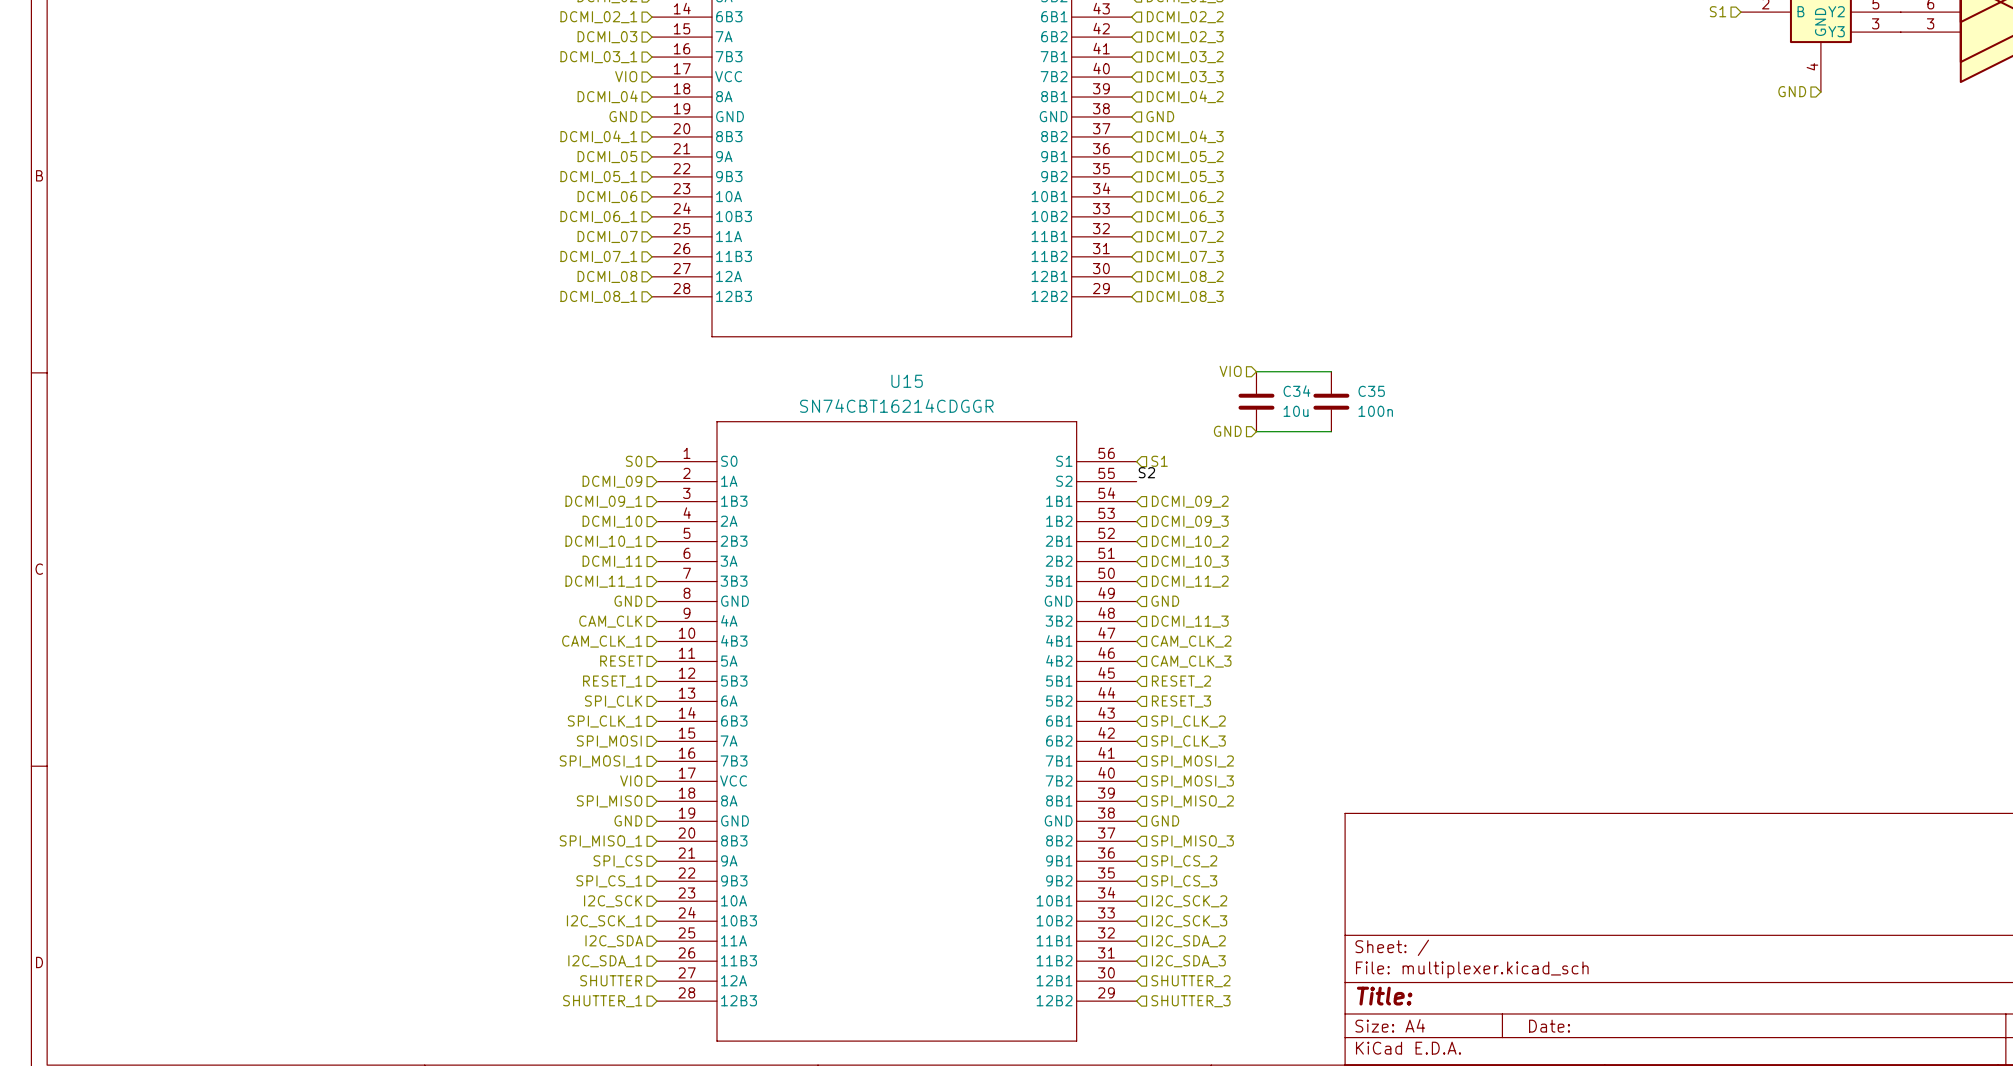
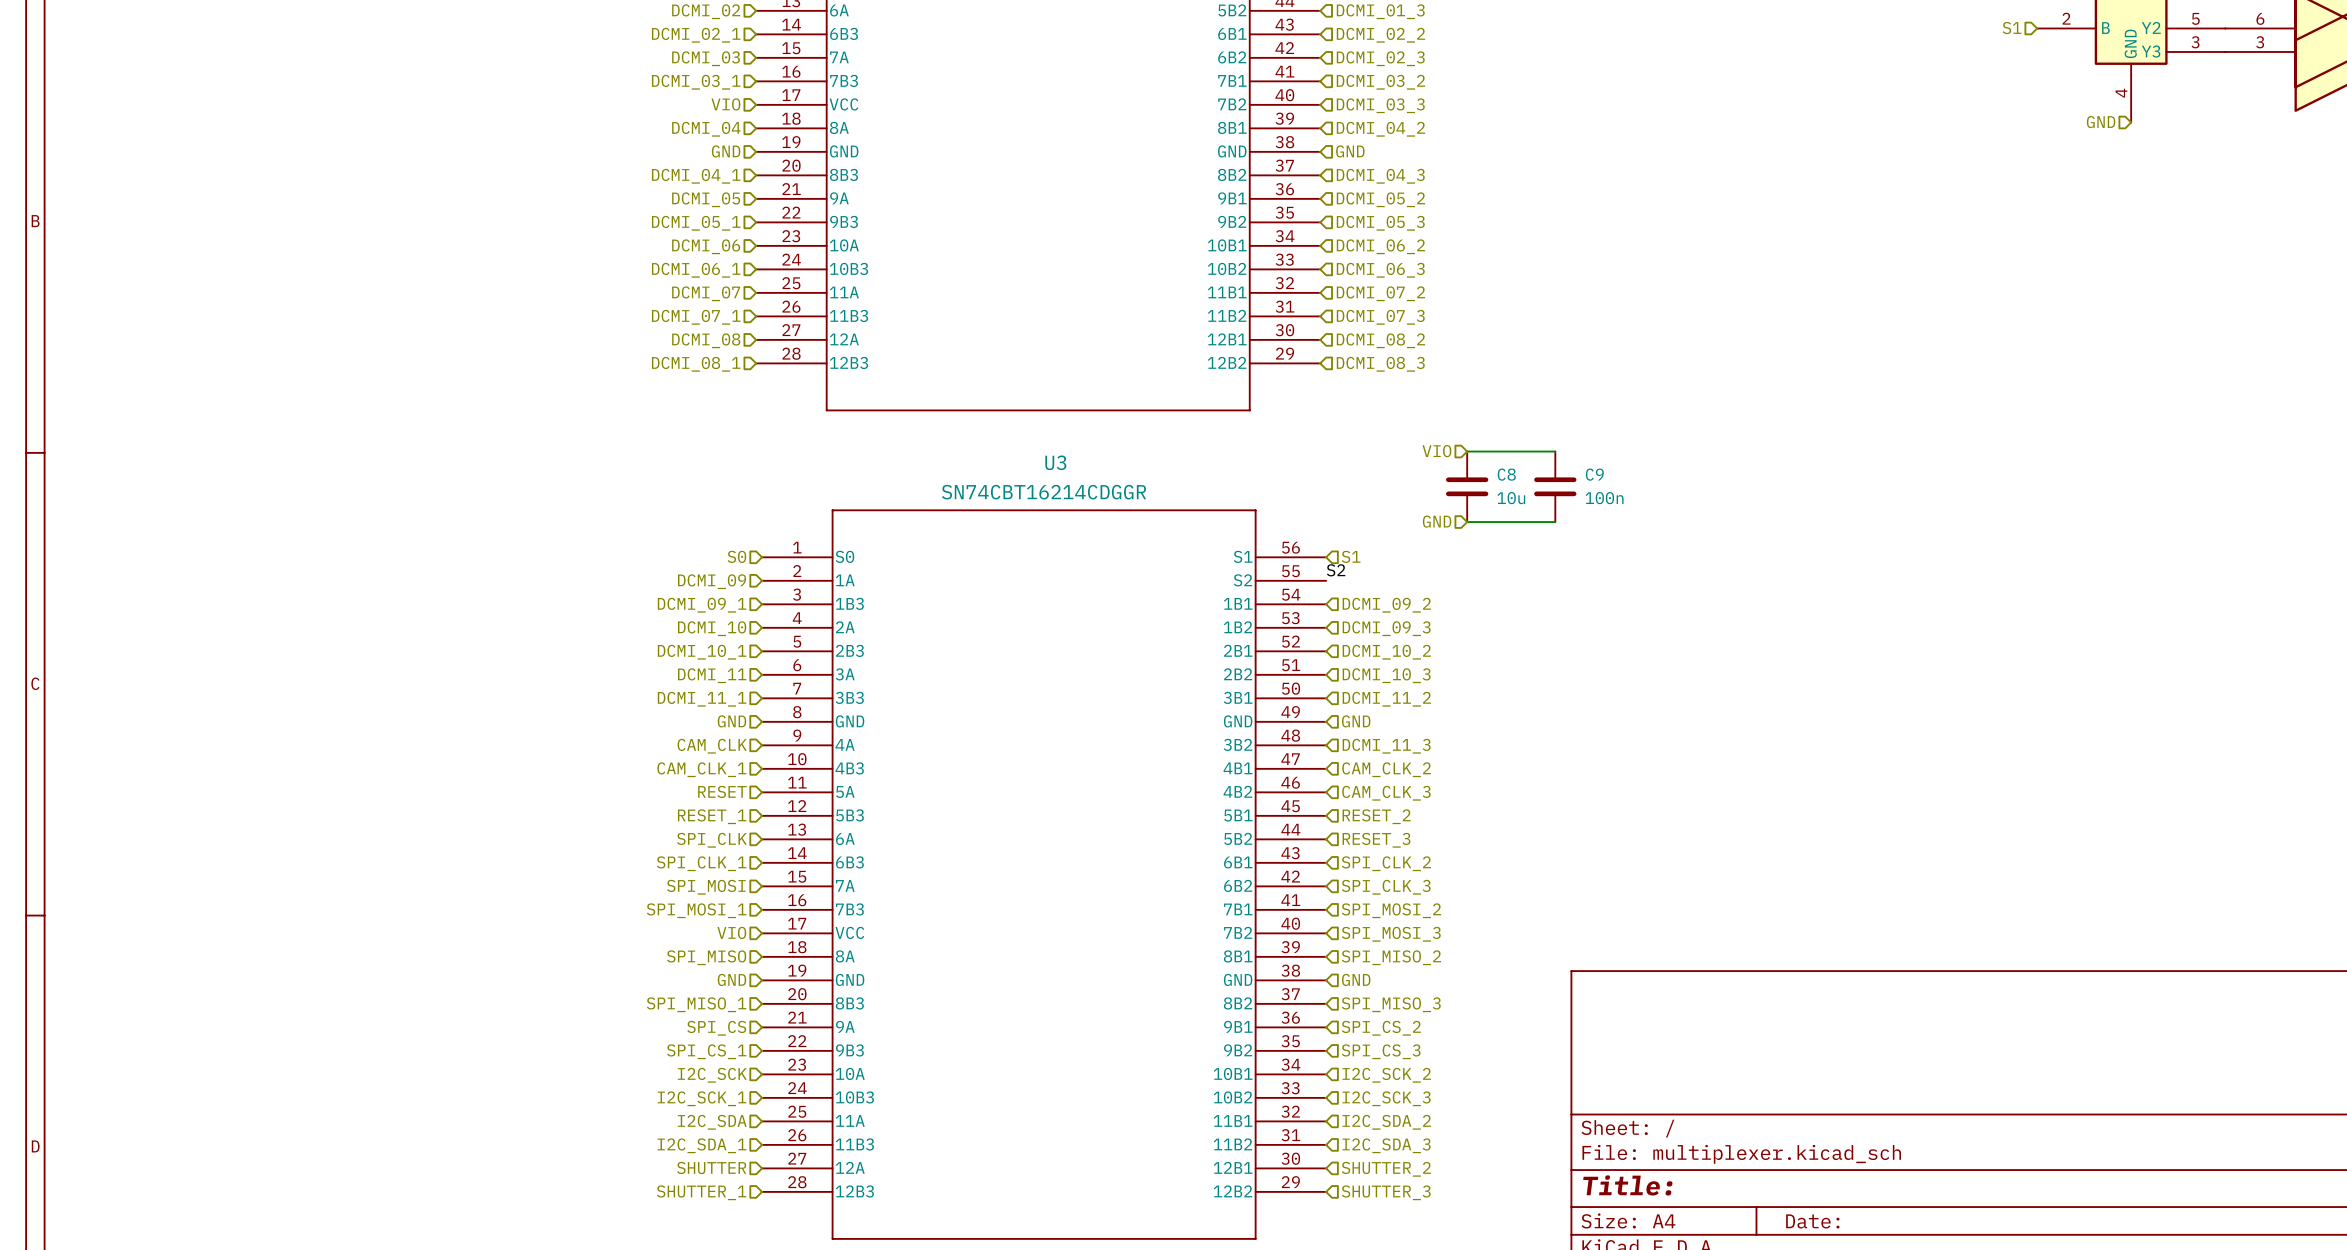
U15 name: U15 (907, 381) -> U3 (1055, 462)
C34 name: C34 (1296, 391) -> C8 (1506, 474)
C35 name: C35 (1371, 391) -> C9 (1594, 474)

